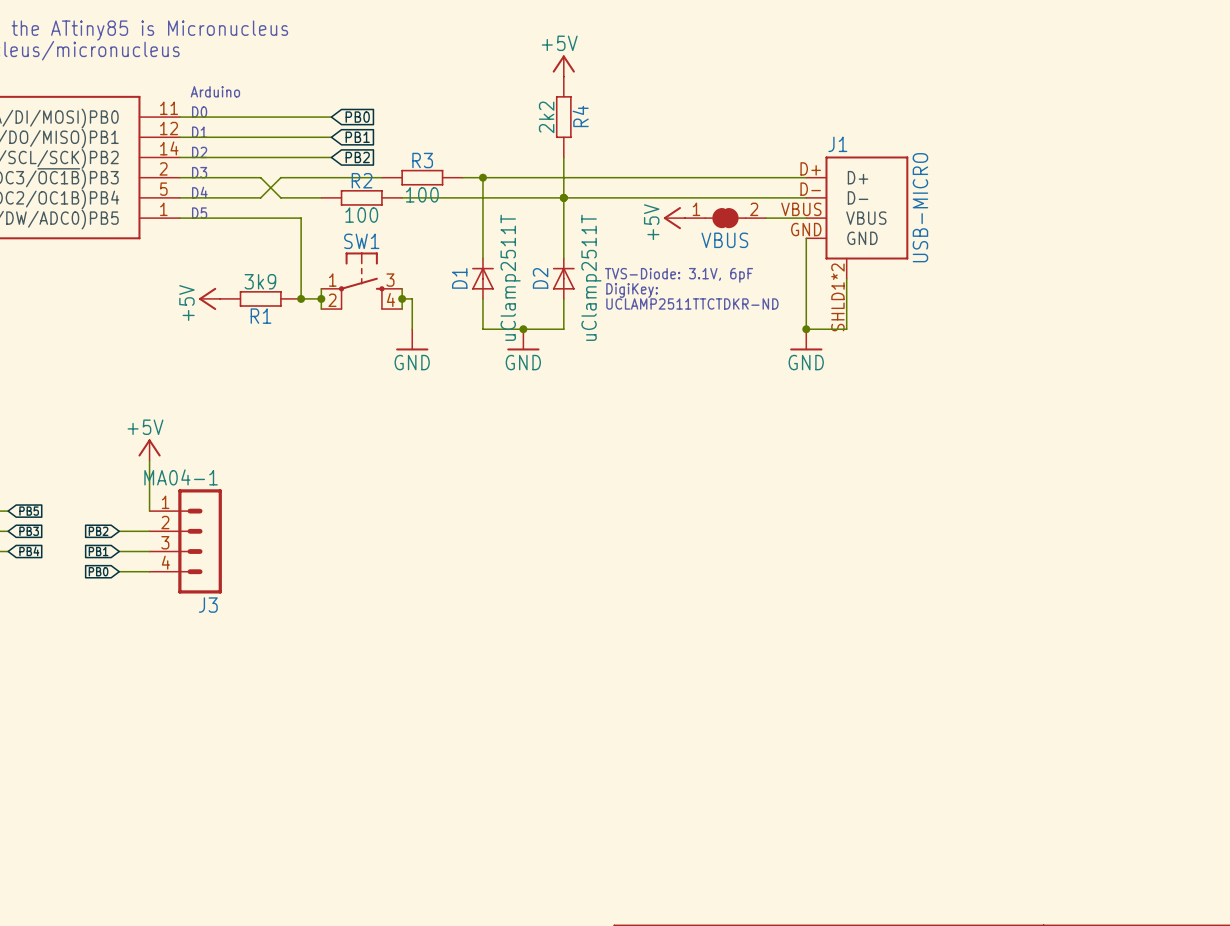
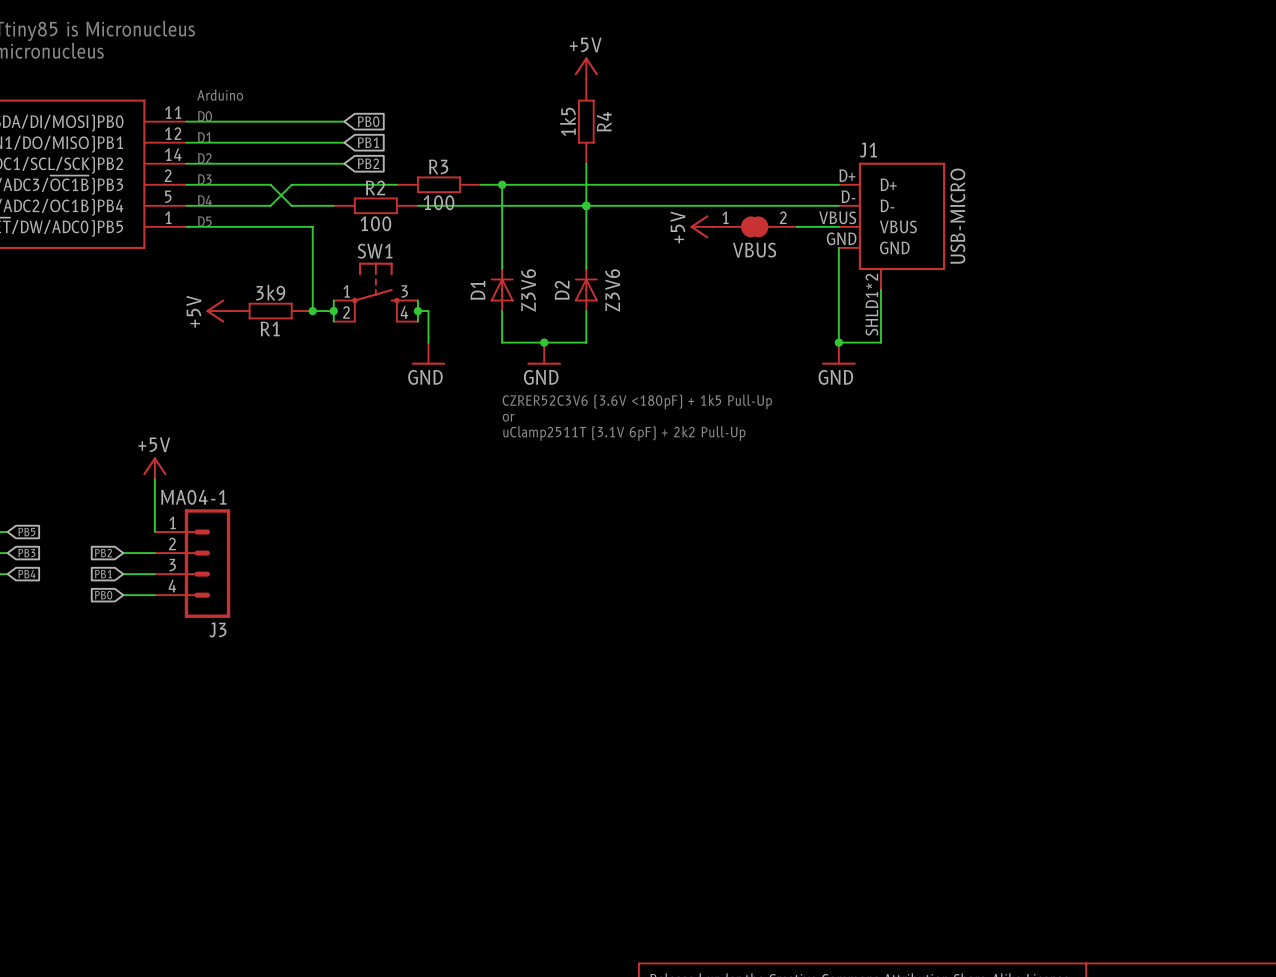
R4 value: 2k2 (546, 117) -> 1k5 (567, 121)
text: TVS-Diode: 3.1V, 6pF (679, 275) -> none
D1 value: uClamp2511T (510, 277) -> Z3V6 (528, 290)
D2 value: uClamp2511T (591, 277) -> Z3V6 (612, 290)
text: DigiKey: (632, 290) -> none
text: UCLAMP2511TTCTDKR-ND (692, 303) -> none
text: none -> CZRER52C3V6 (3.6V <180pF) + 1k5 Pull-Up (637, 401)
text: none -> or (508, 417)
text: none -> uClamp2511T (3.1V 6pF) + 2k2 Pull-Up (624, 433)

